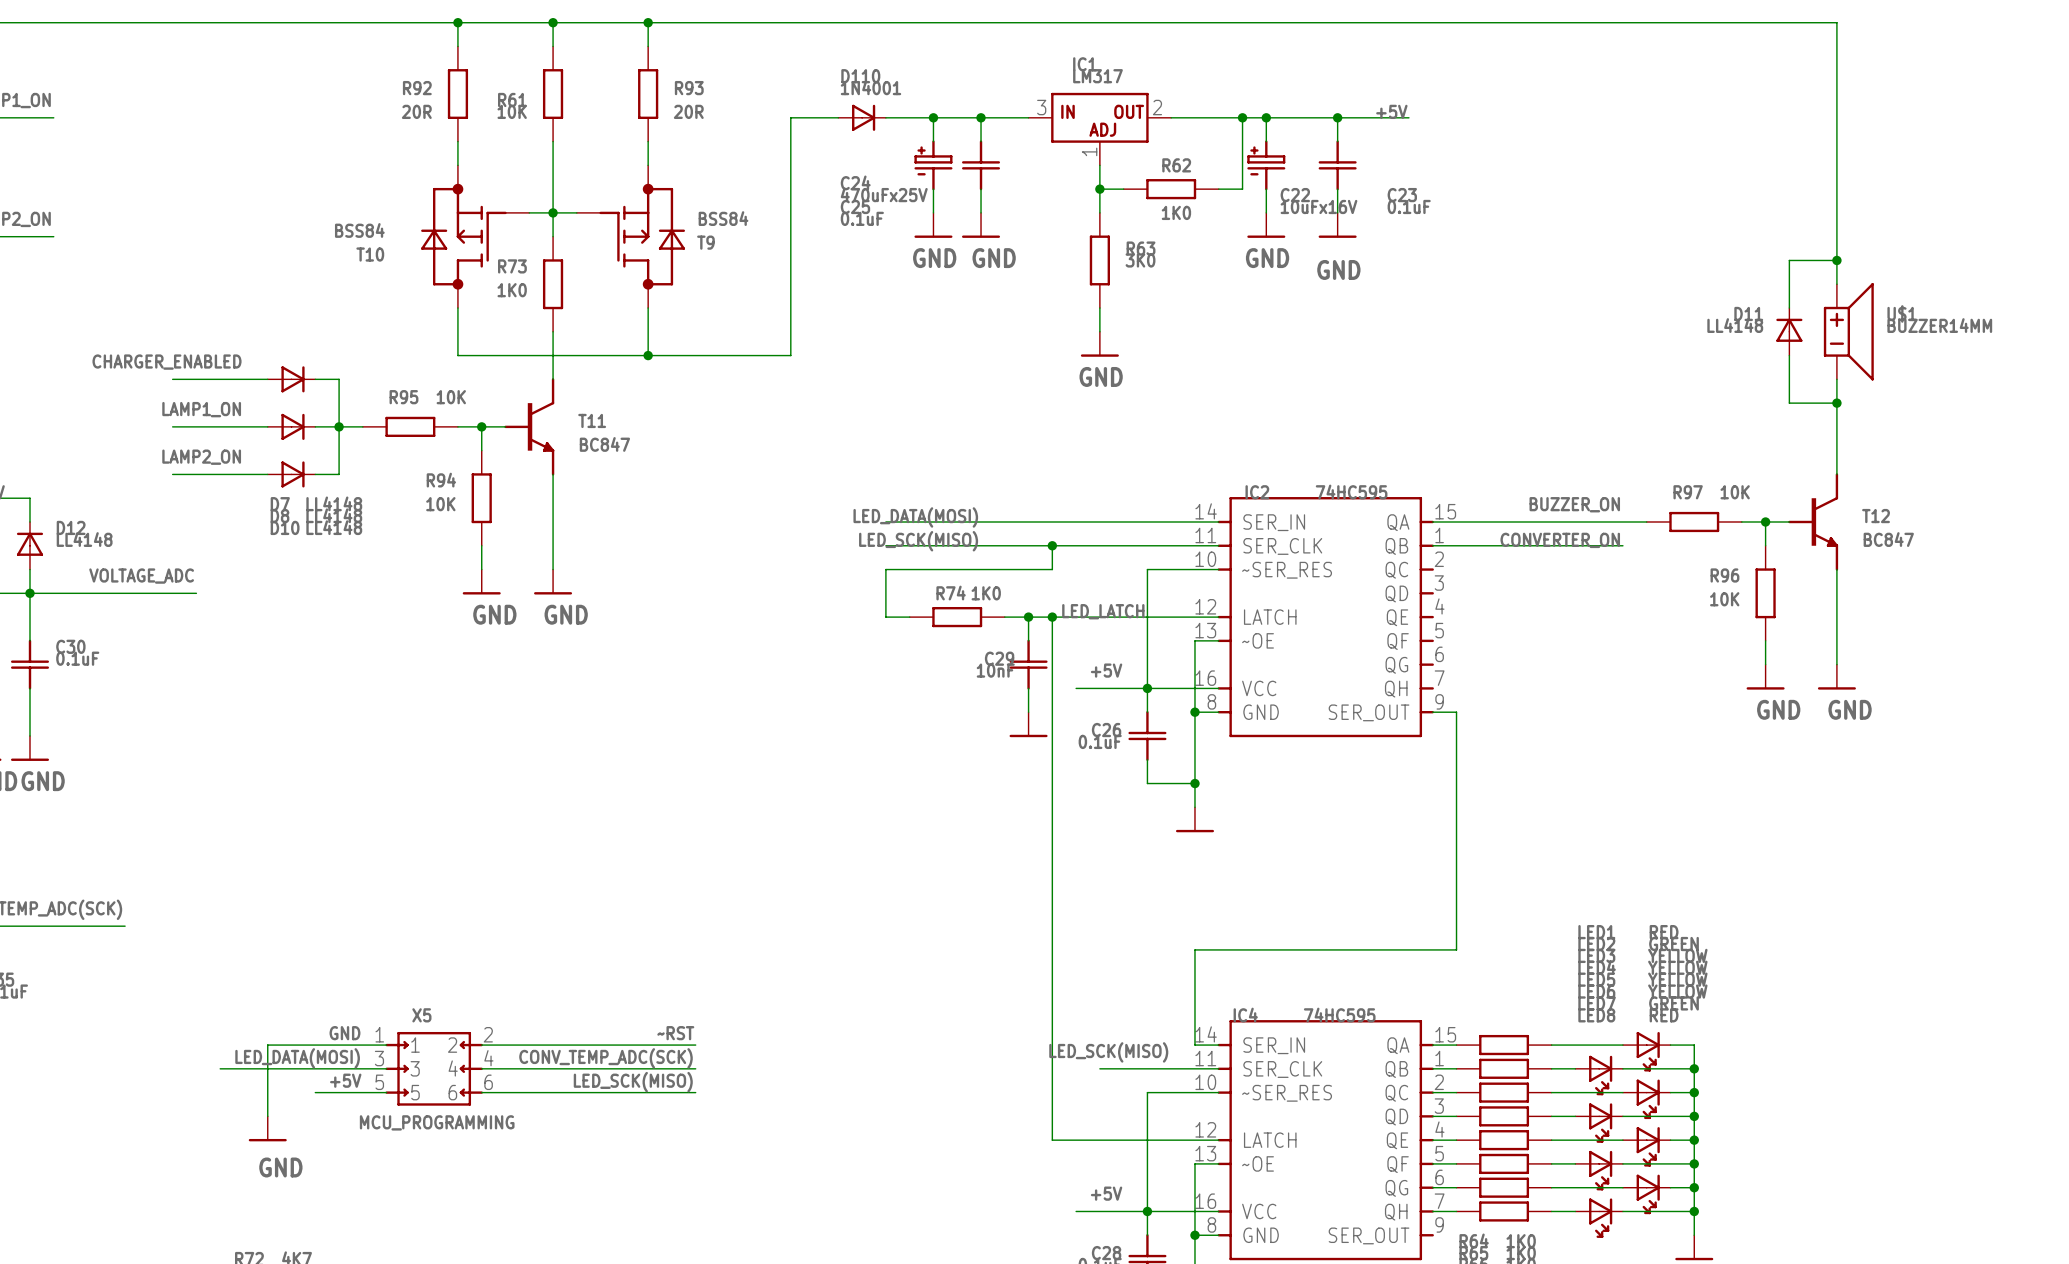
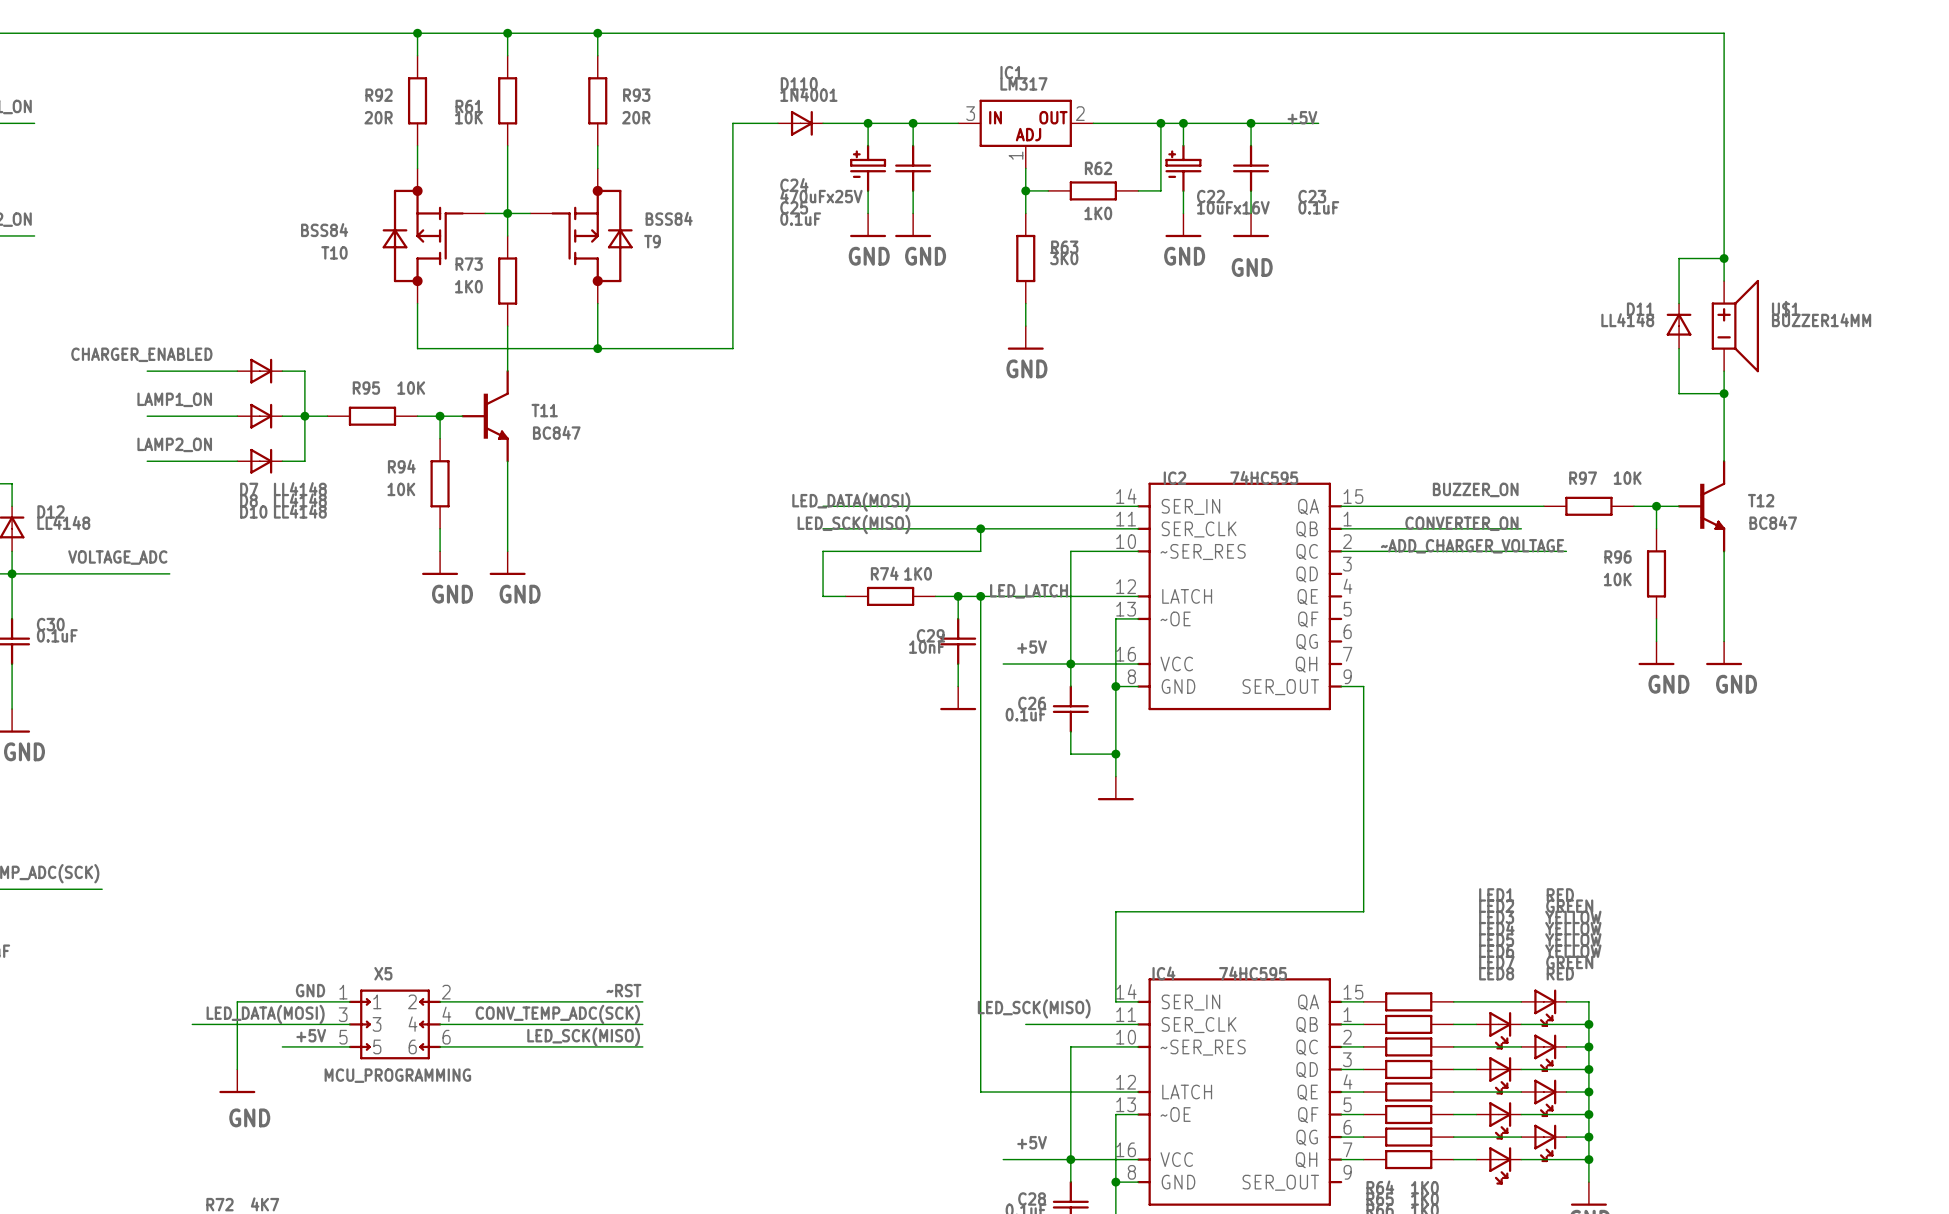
label: none -> ~ADD_CHARGER_VOLTAGE (1472, 546)
wire: none -> (1341, 551) (1566, 551)

